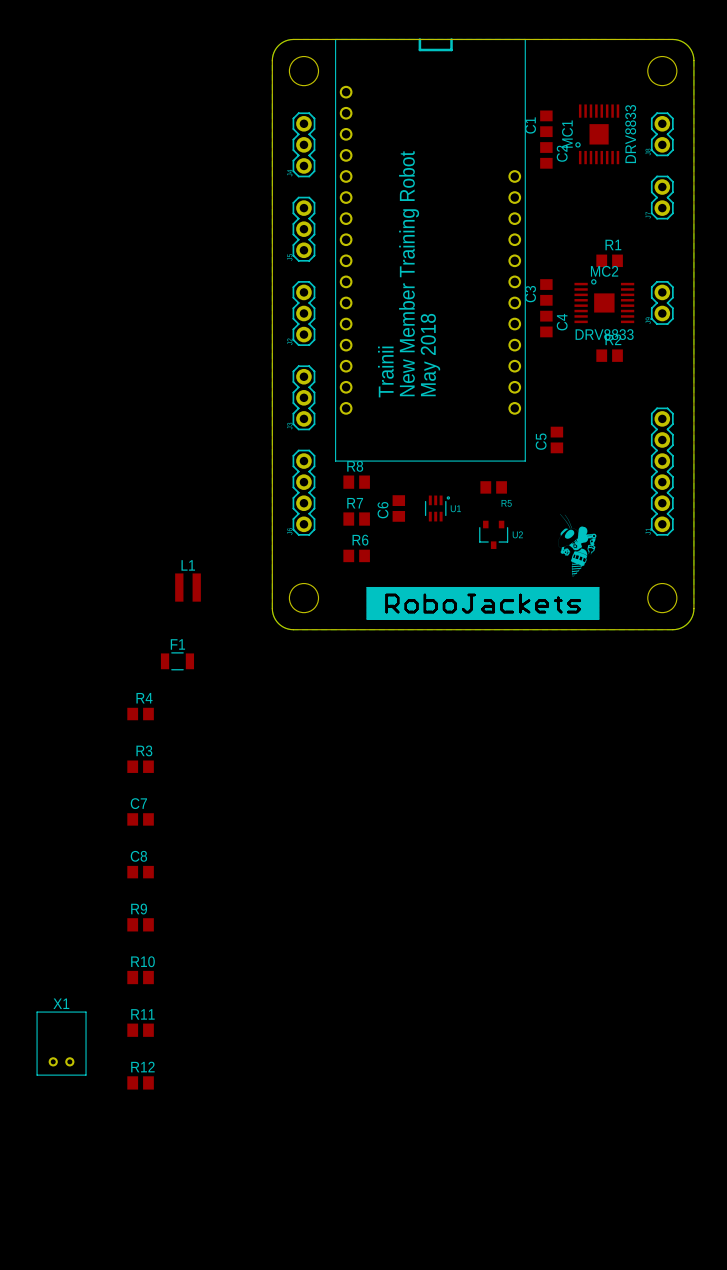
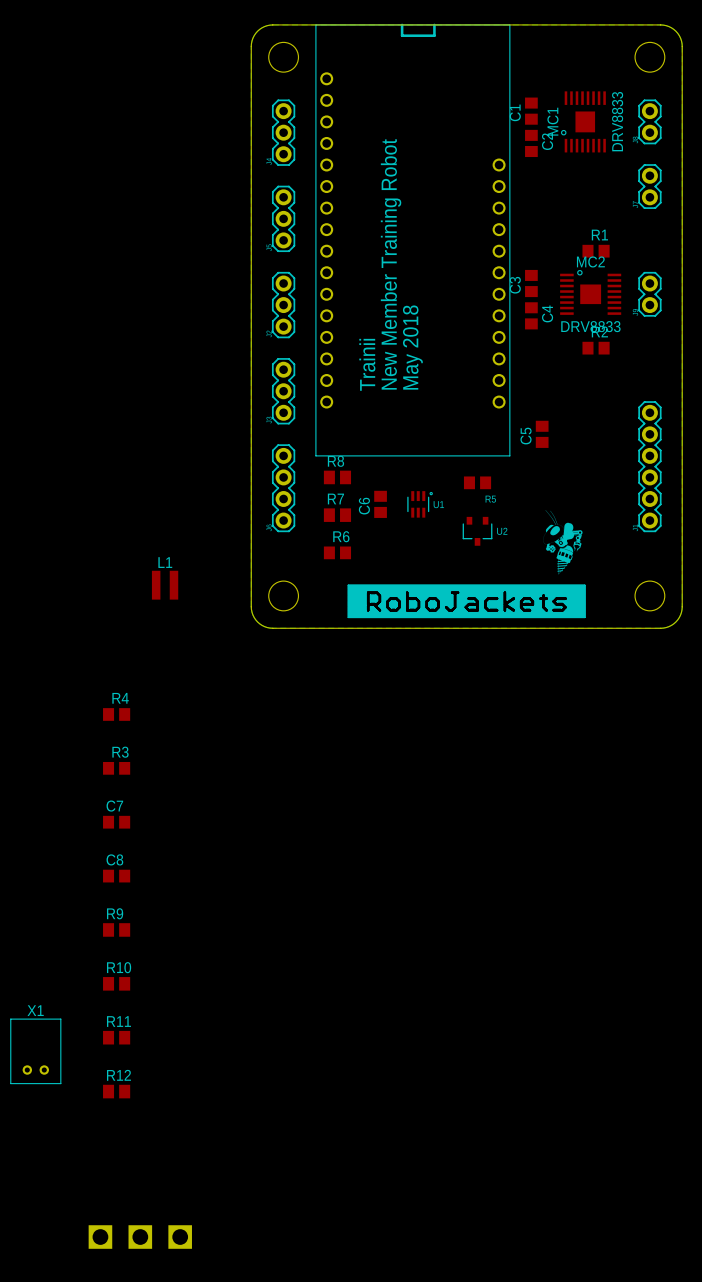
F1: (177, 661) -> none
part: none -> (140, 1237)

